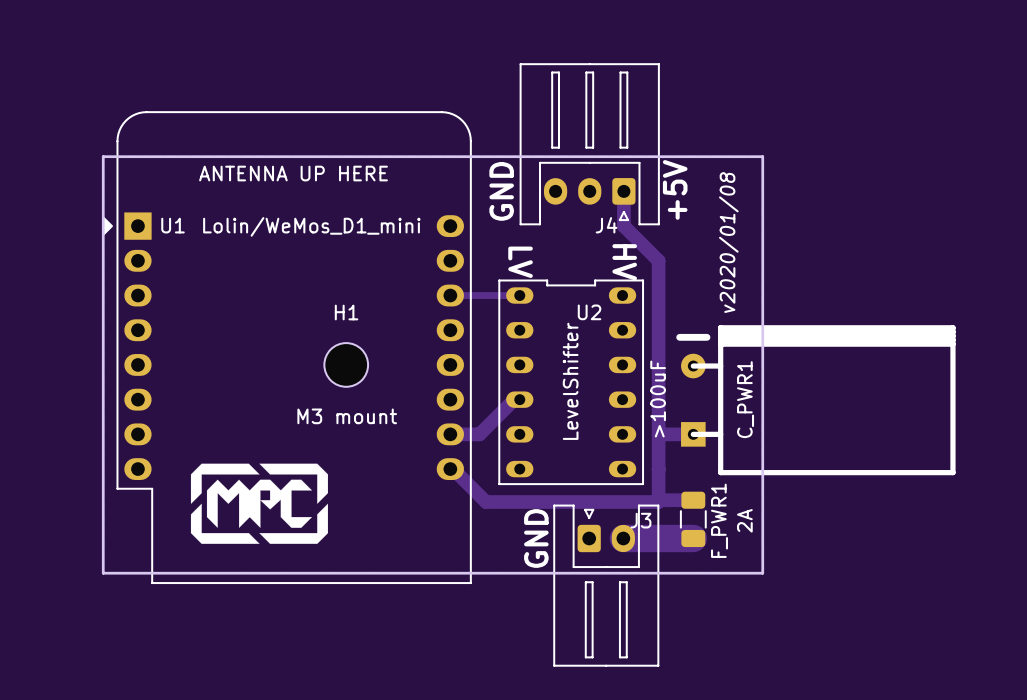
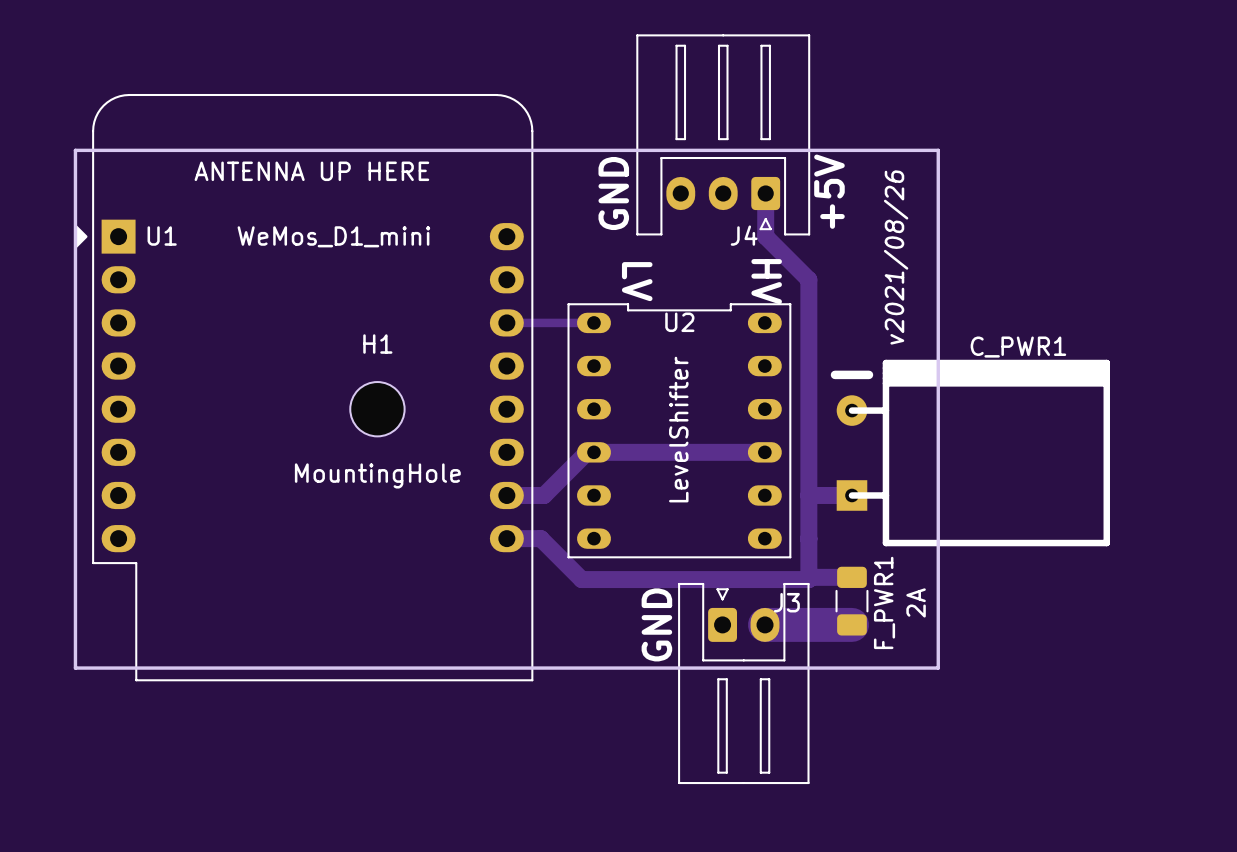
board edge: (103, 156) (103, 573) -> (118, 150) (75, 150) (75, 668) (118, 668)
text position: ANTENNA UP HERE (293, 173) -> ANTENNA UP HERE (311, 171)
U1 value: Lolin/WeMos_D1_mini (311, 226) -> WeMos_D1_mini (333, 236)
text: v2020/01/08 (728, 242) -> v2021/08/26 (896, 257)
U2 footprint: [498, 279, 644, 485] -> [567, 303, 792, 559]
track: (485, 295) (519, 295) -> (506, 322) (550, 322)
C_PWR1 footprint: [676, 325, 956, 476] -> [830, 359, 1110, 547]
U1 position: (286, 347) -> (303, 387)
H1 position: (346, 364) -> (377, 409)
track: (514, 399) (479, 434) (450, 434) -> (629, 452) (587, 452) (544, 495) (506, 495)
track: none -> (636, 452) (764, 452)
C_PWR1 value: >100uF (658, 399) -> none
C_PWR1 name position: C_PWR1 (745, 399) -> C_PWR1 (1018, 347)
H1 value: M3 mount (347, 416) -> MountingHole (377, 475)
drawing: [190, 463, 329, 544] -> none
track: (450, 469) (453, 469) (486, 502) -> (506, 538) (540, 538) (581, 579) (594, 579)

